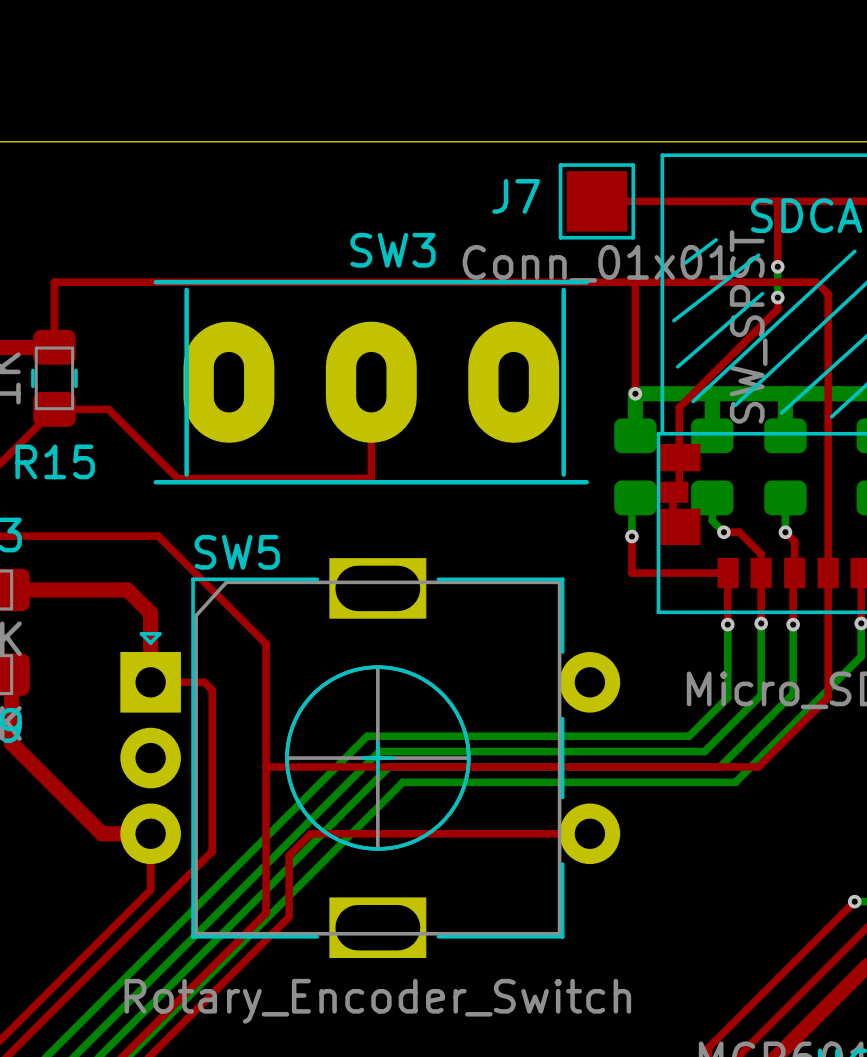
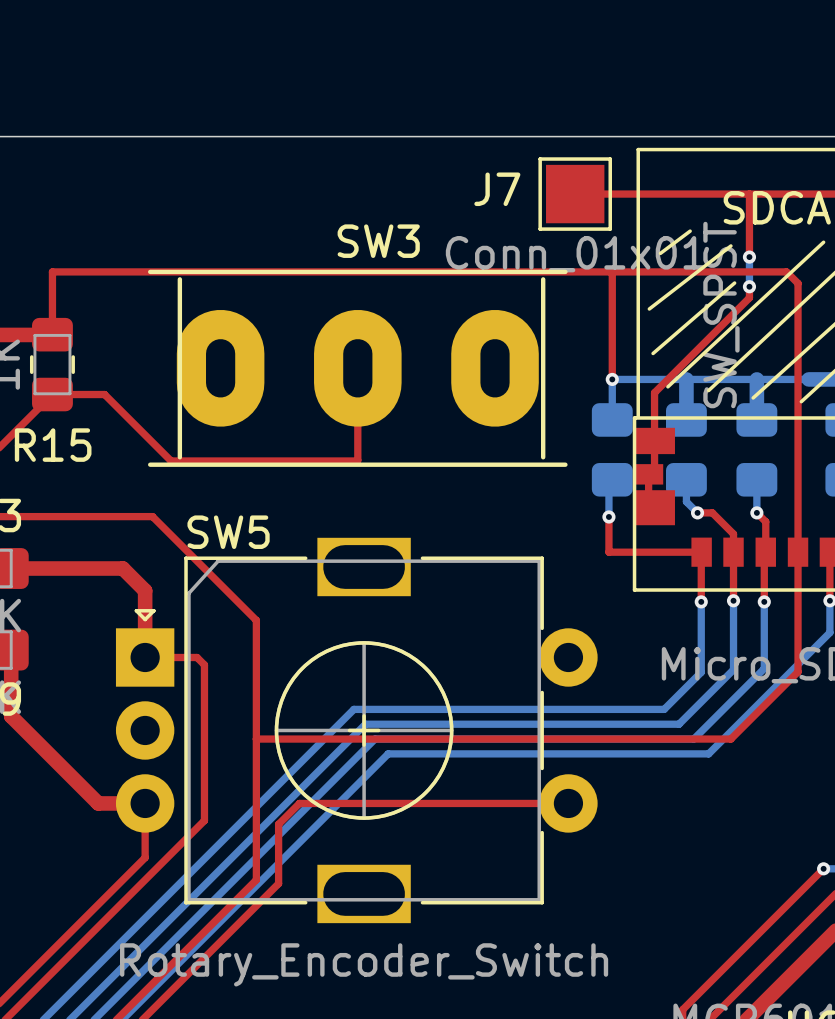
bottom track width: thick (839, 393) (635, 393) (635, 435) -> thin (808, 379) (612, 379) (612, 419)

